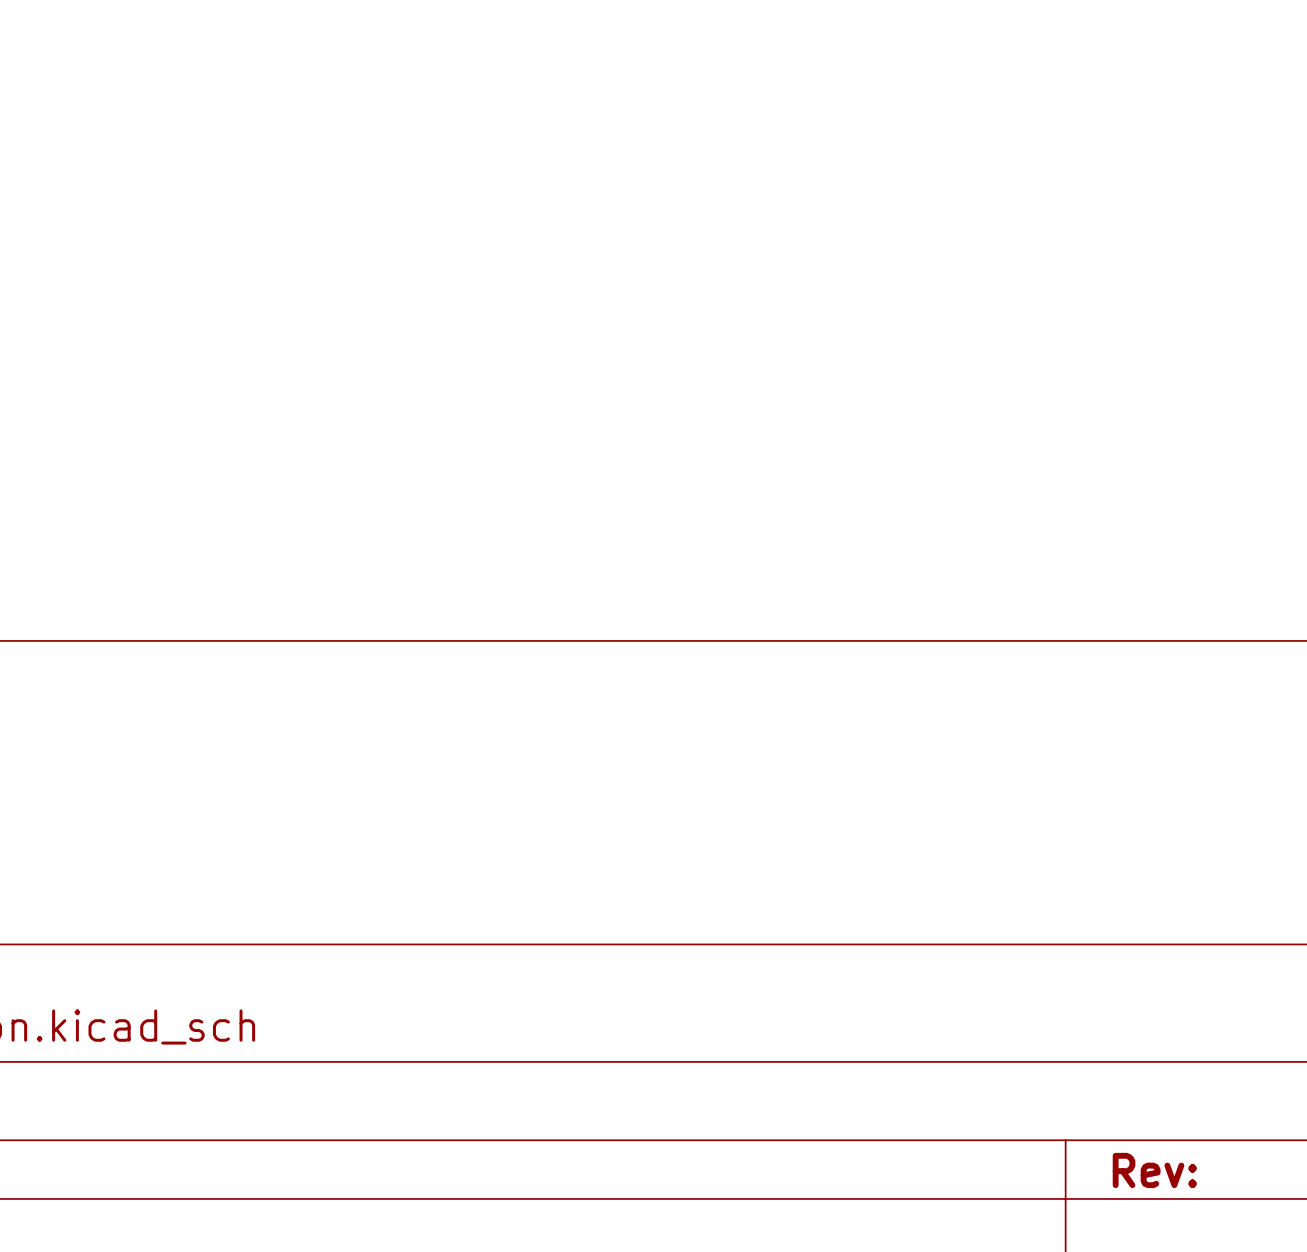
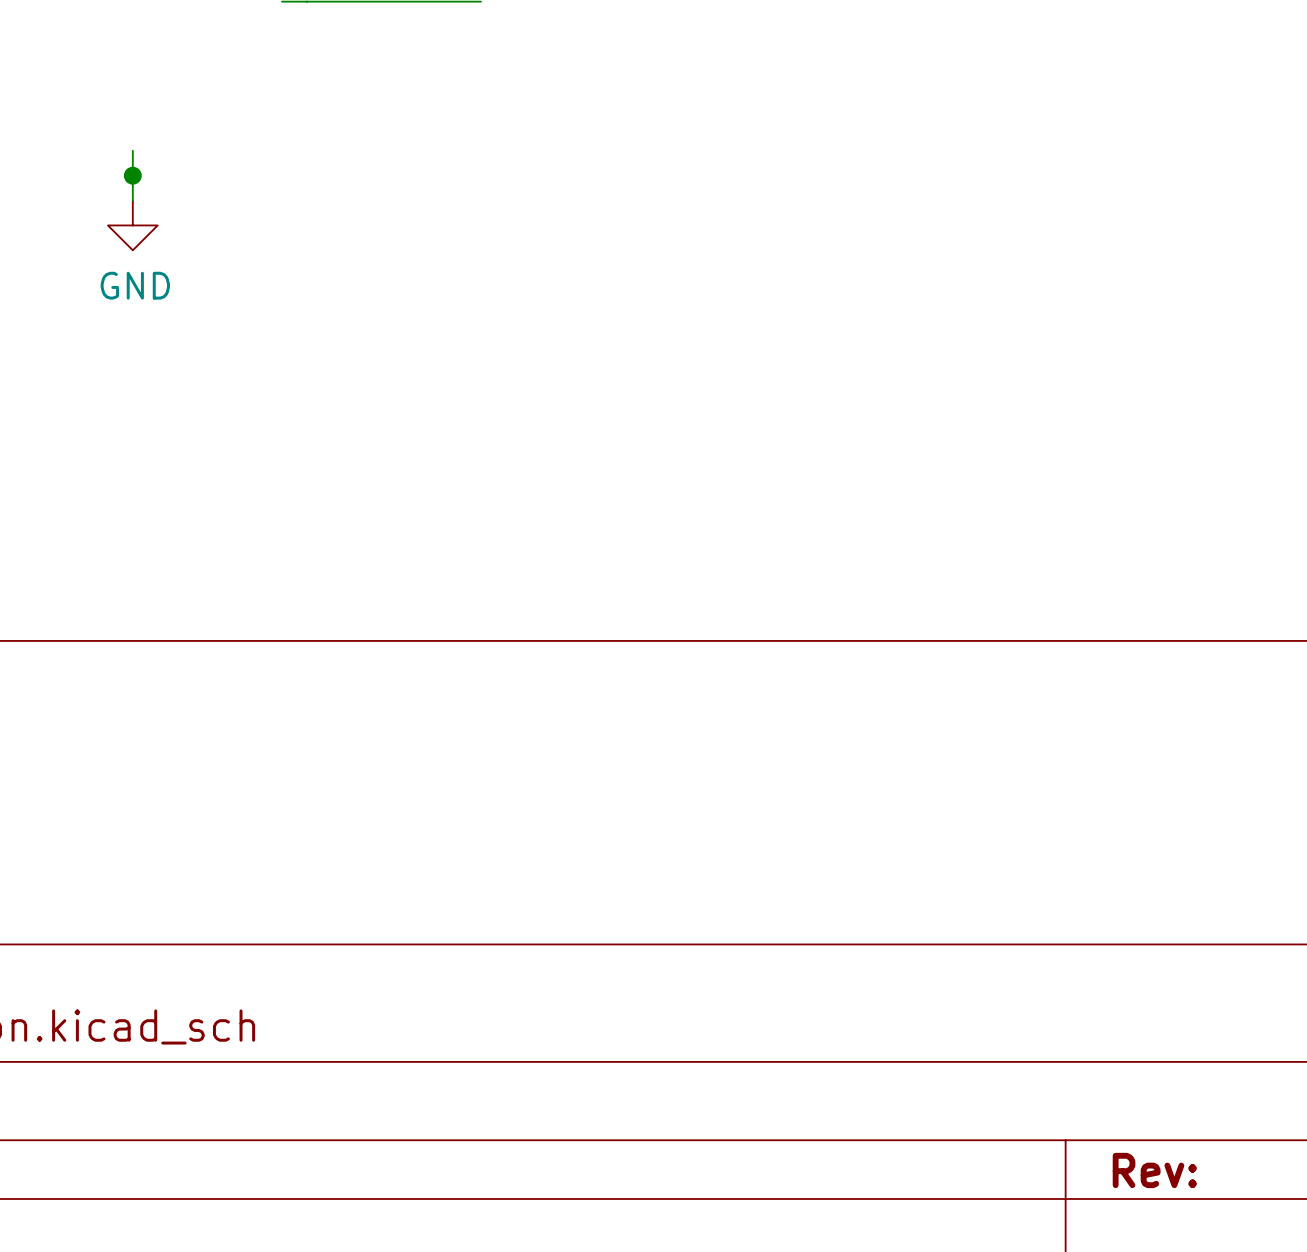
wire: none -> (282, 1) (480, 1)
wire: none -> (132, 150) (132, 200)
junction: none -> (132, 175)
power symbol: none -> GND (132, 225)

